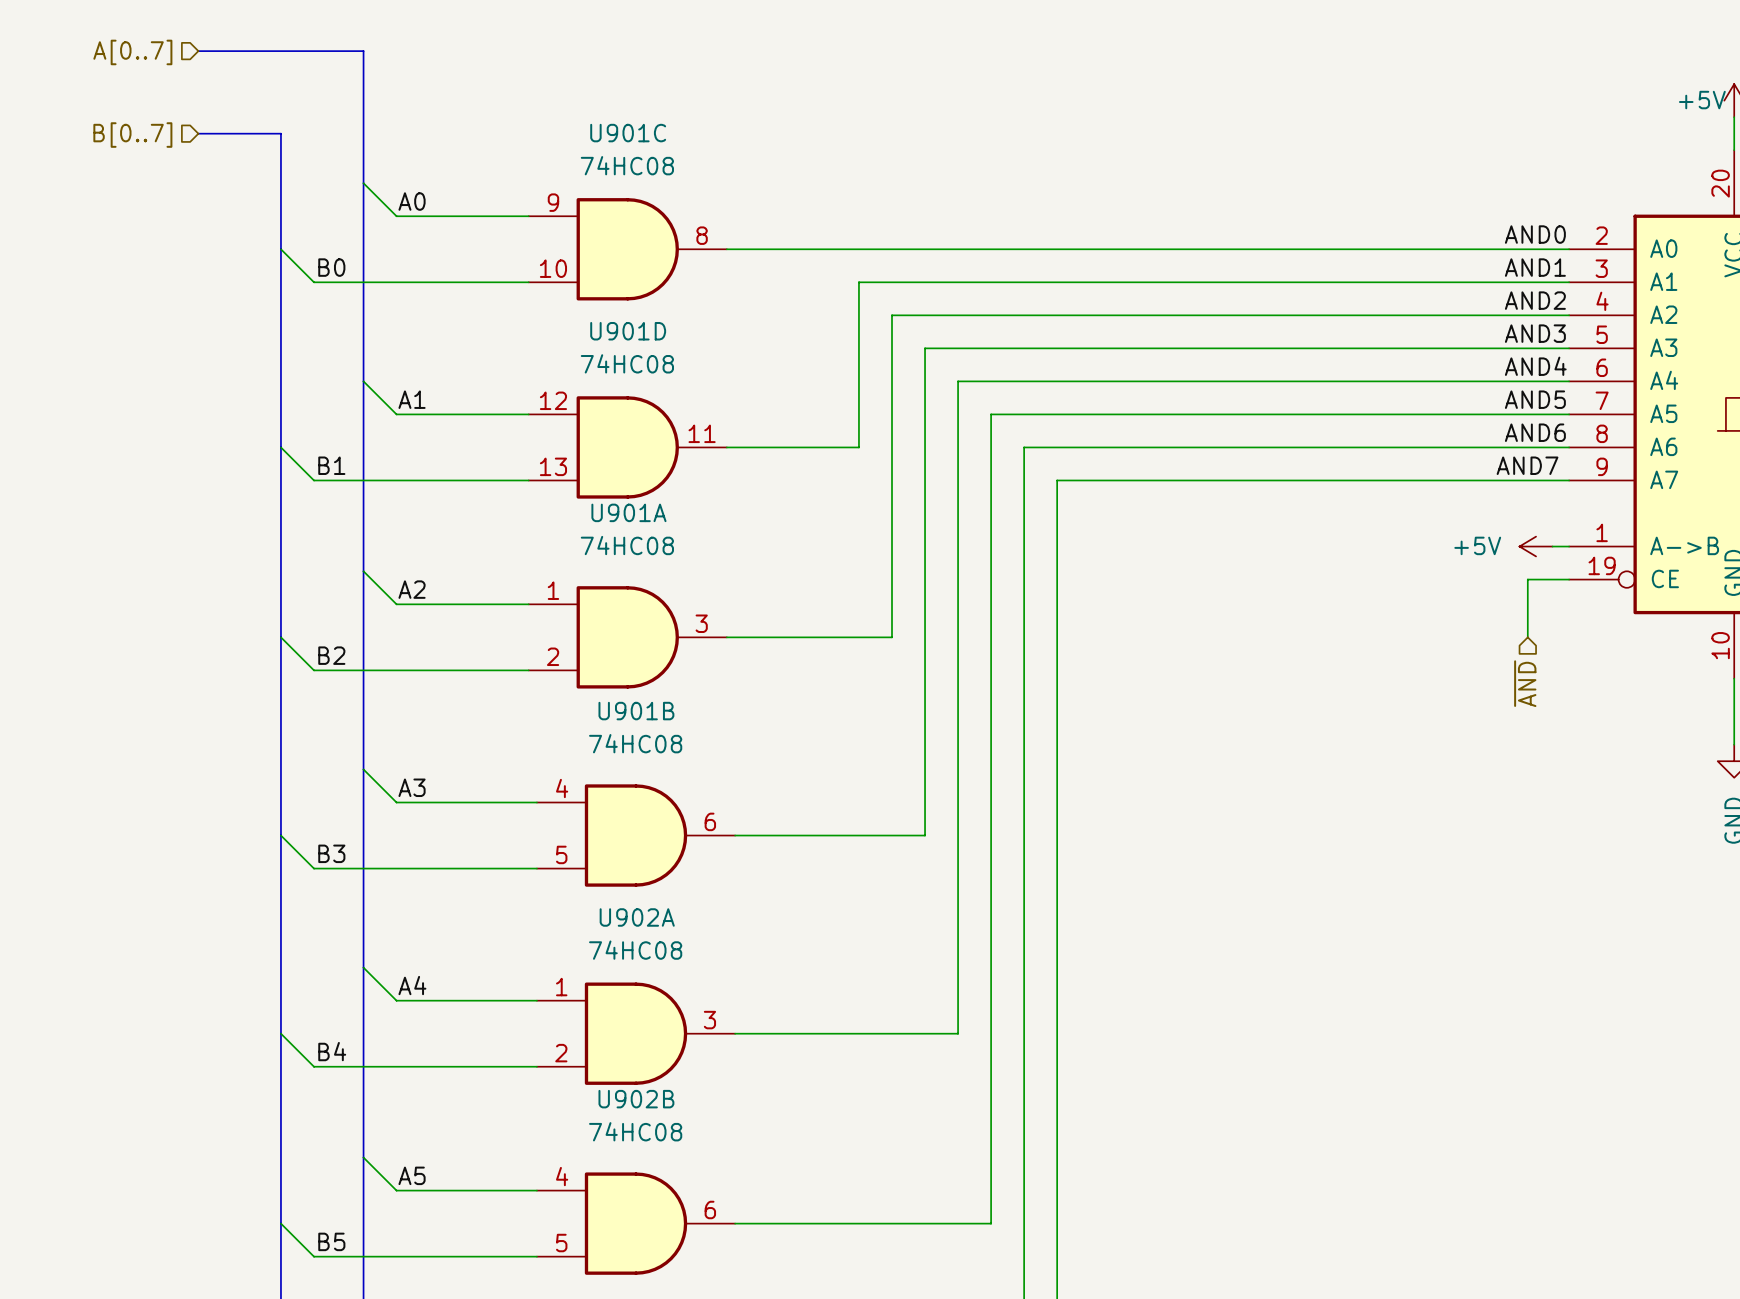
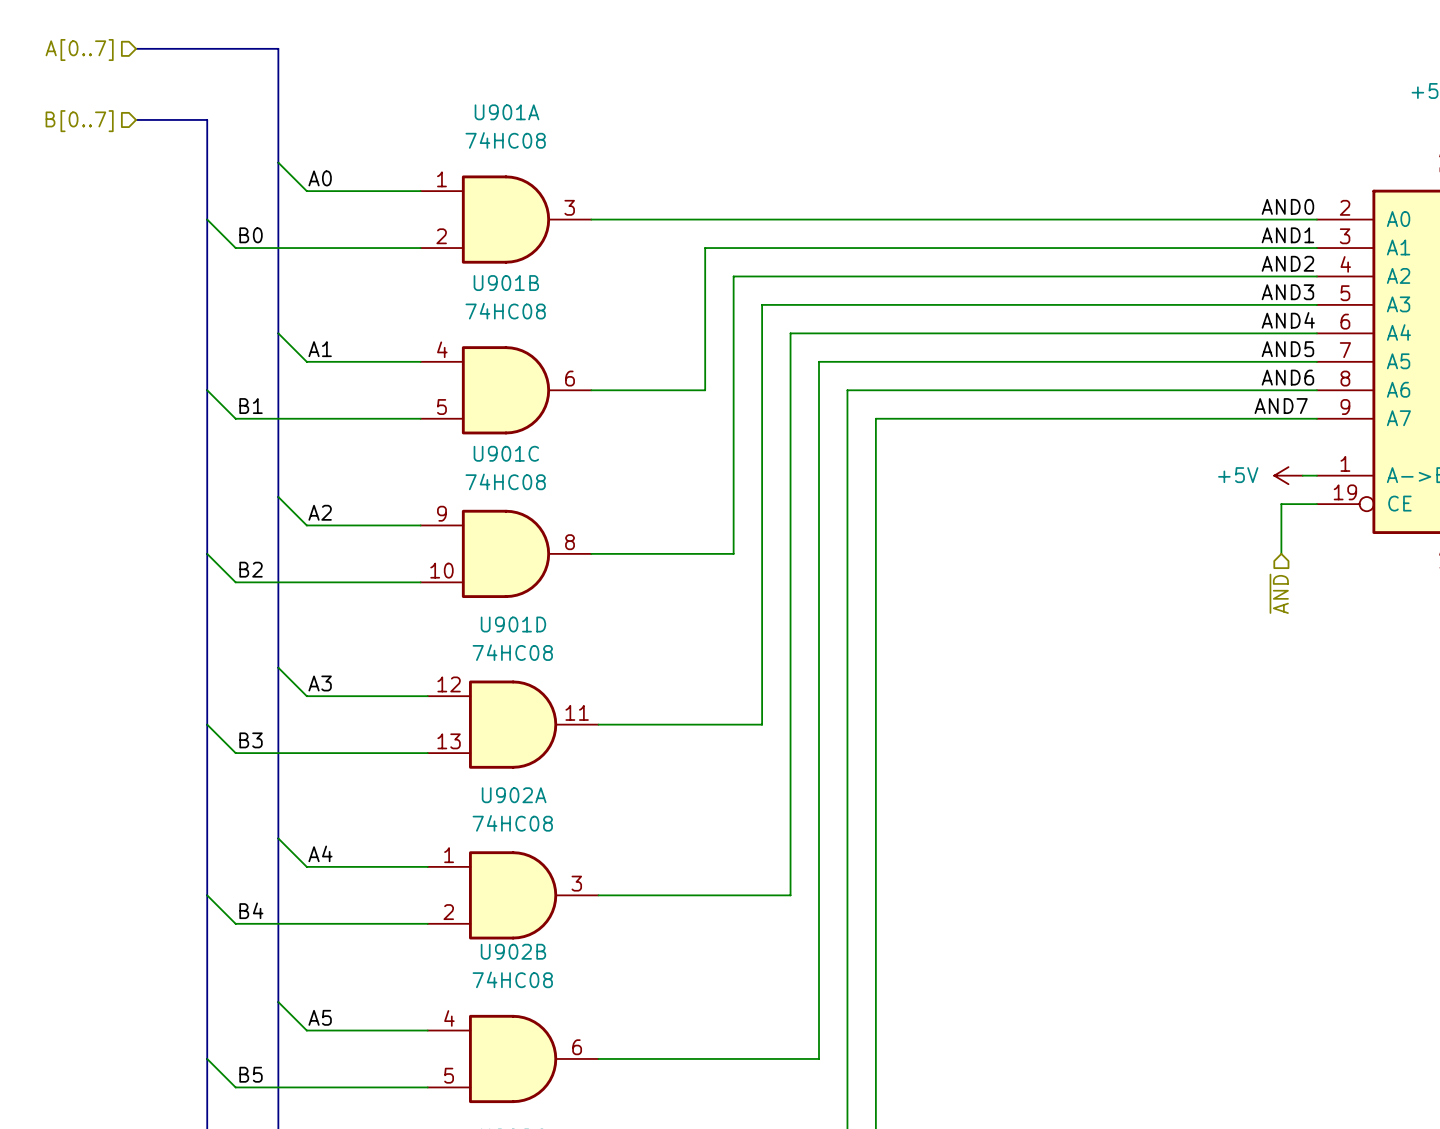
U901C position: (627, 249) -> (505, 553)
U901D position: (627, 447) -> (513, 724)
U901A position: (627, 637) -> (505, 219)
U901B position: (636, 835) -> (505, 390)

